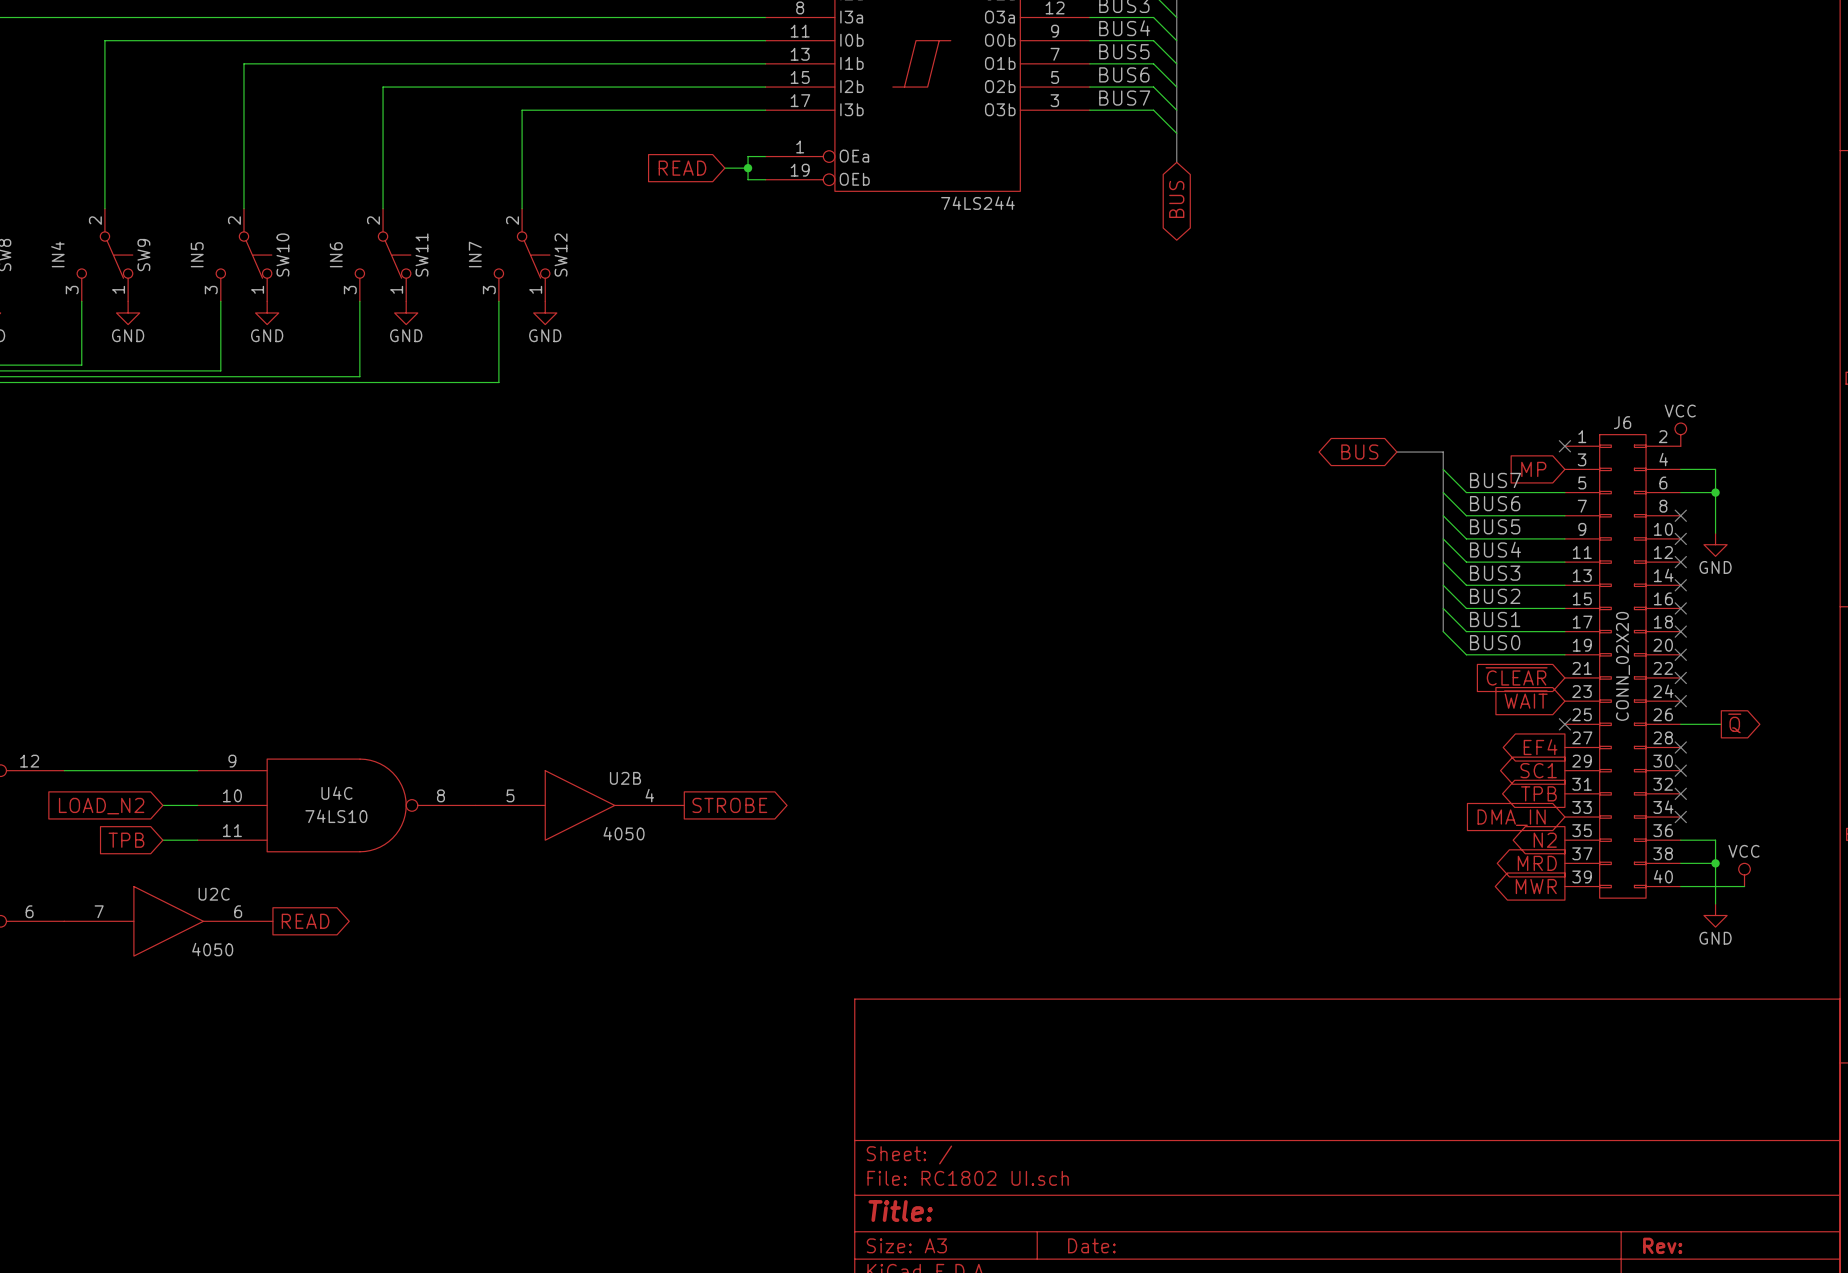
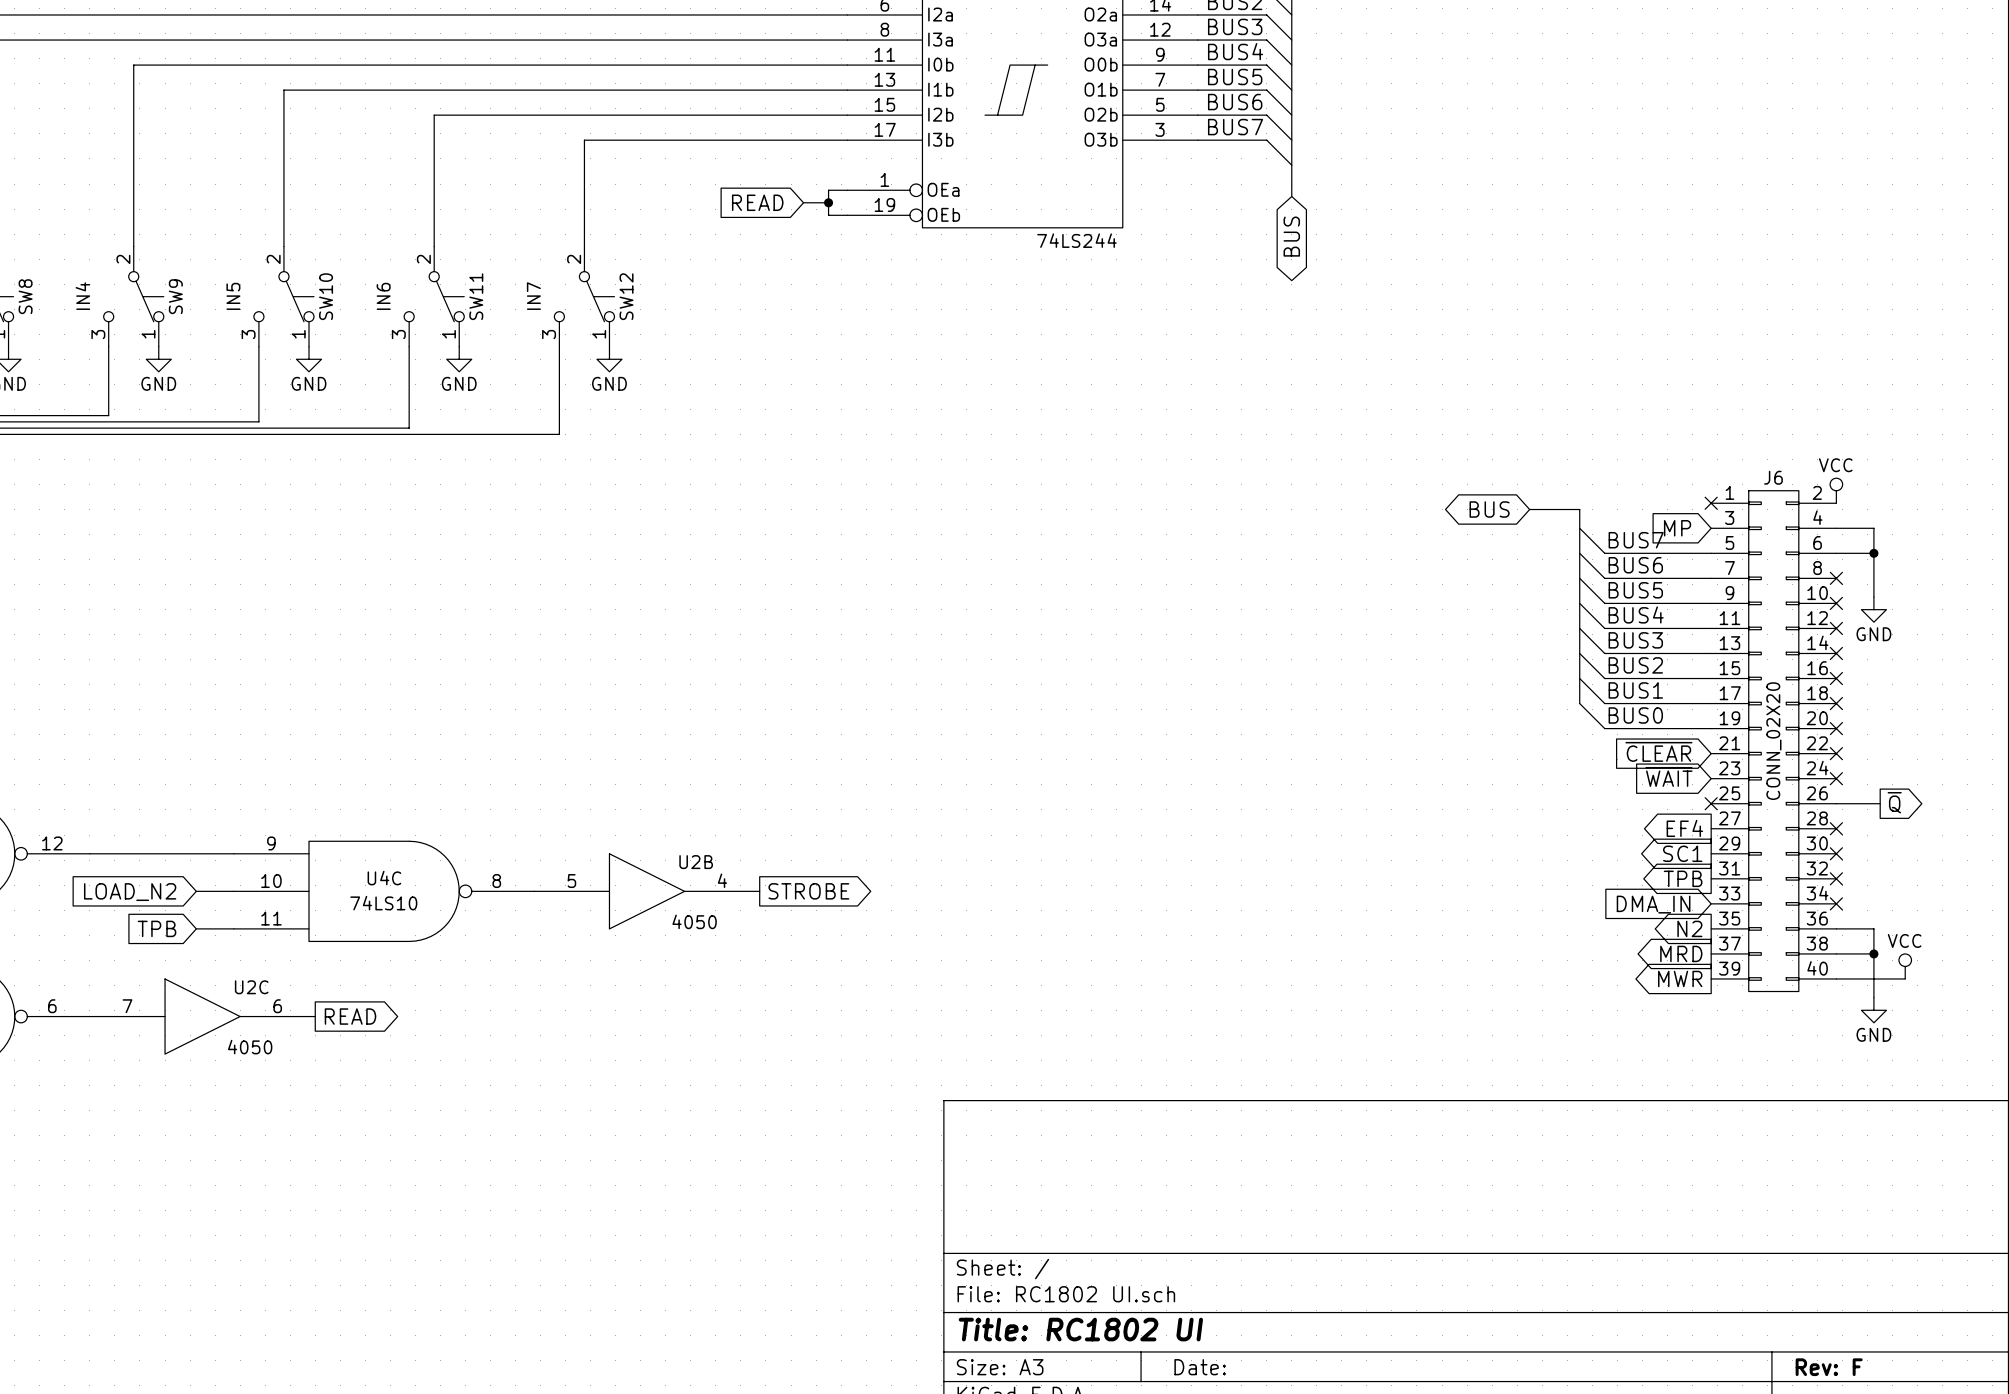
title block: Title: (900, 1211) -> Title: RC1802 UI (1080, 1329)
title block: Rev: (1662, 1245) -> Rev: F (1829, 1367)

